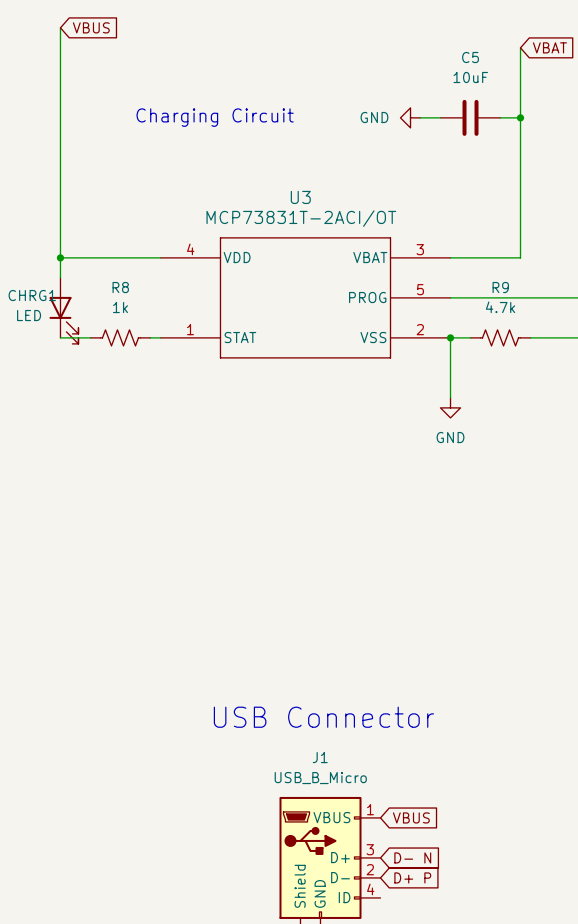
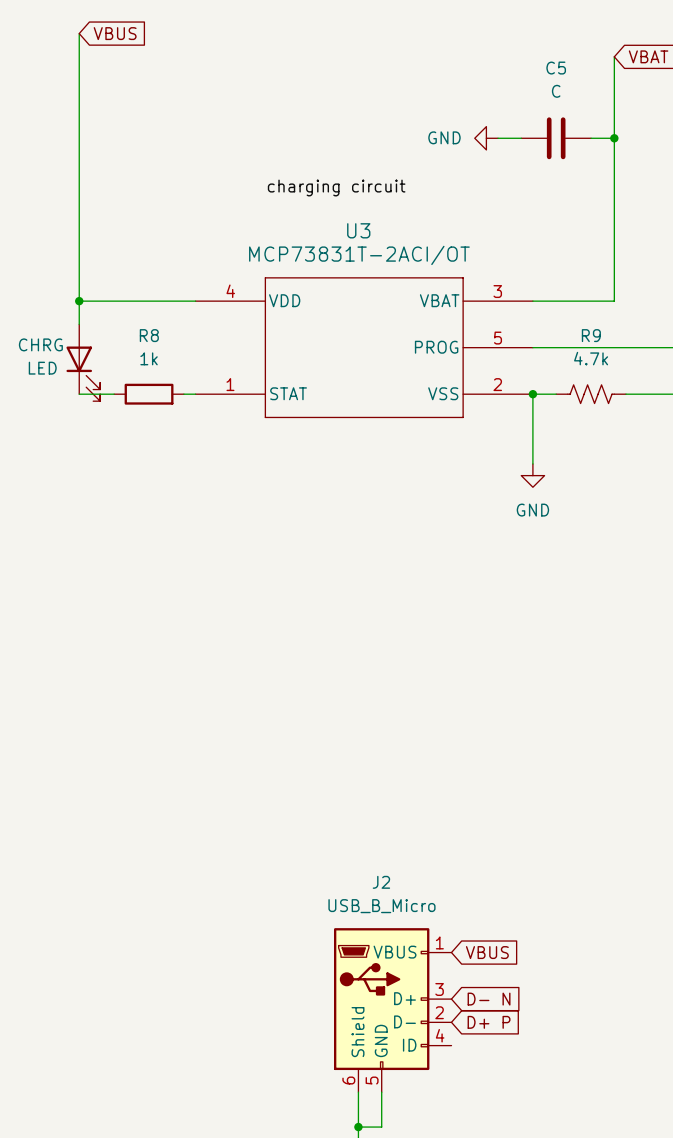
C5 value: 10uF (470, 77) -> C (556, 91)
text: Charging Circuit (215, 117) -> none
label: none -> charging circuit (336, 188)
CHRG1 name: CHRG1 (32, 295) -> CHRG (40, 344)
R8 symbol: [90, 329, 151, 346] -> [114, 383, 184, 405]
text: USB Connector (323, 717) -> none
J1 name: J1 (320, 757) -> J2 (381, 882)

